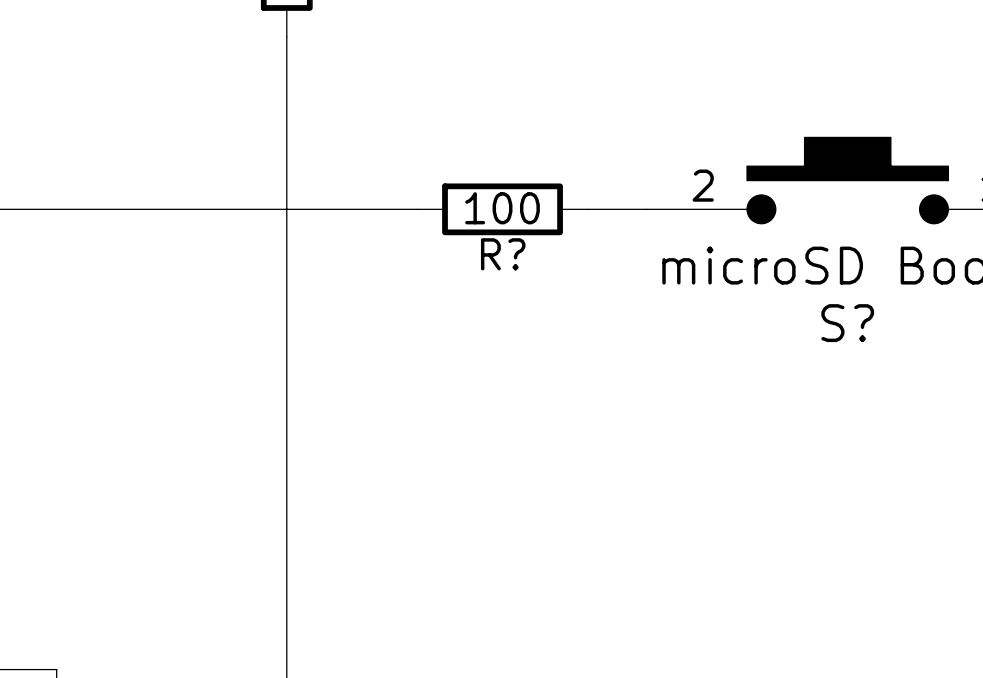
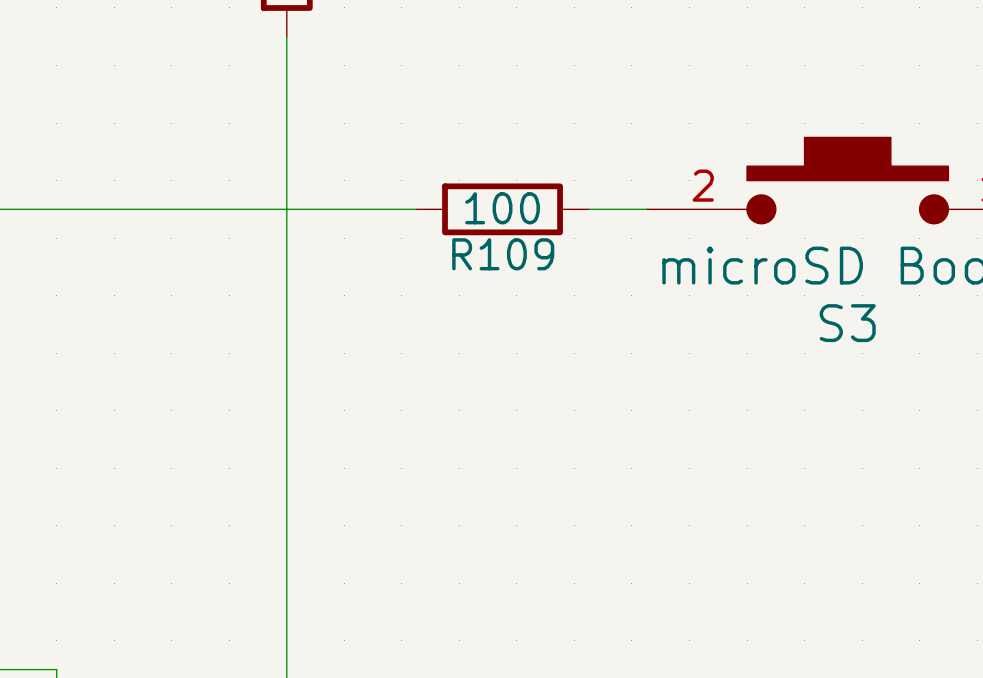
R? name: R? (503, 254) -> R109 (503, 254)
S? name: S? (847, 323) -> S3 (847, 323)

